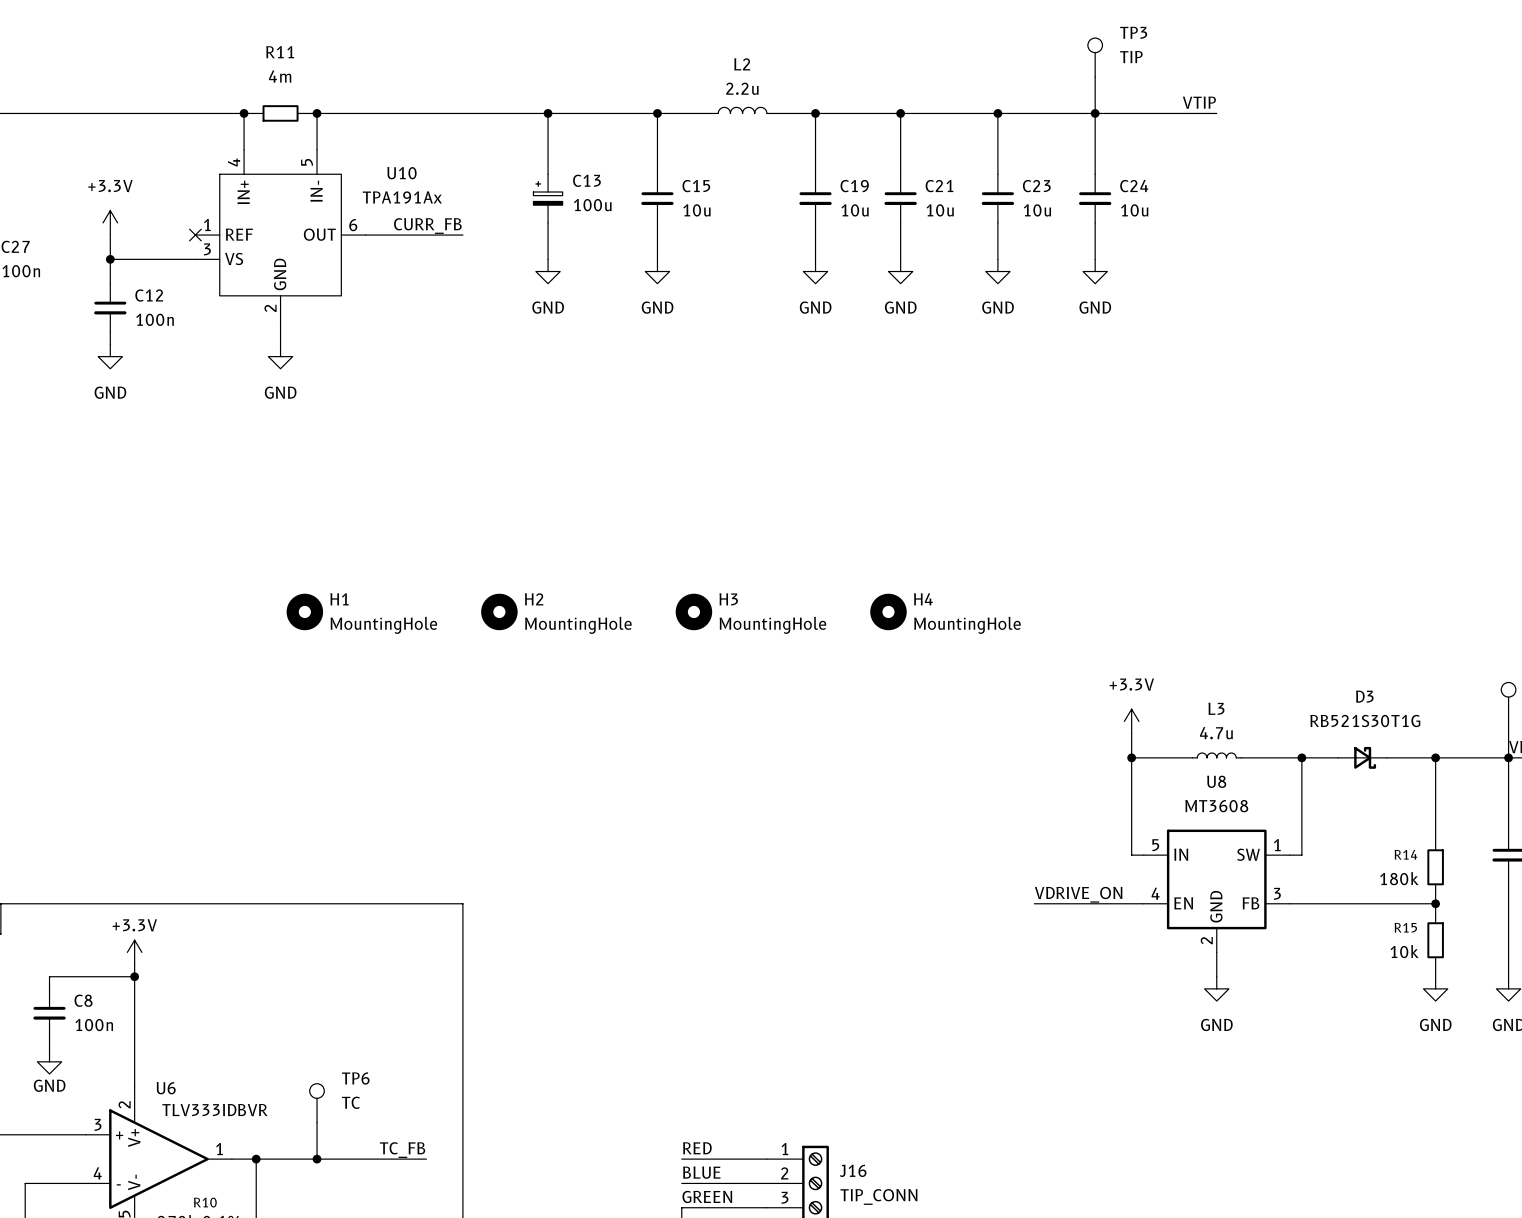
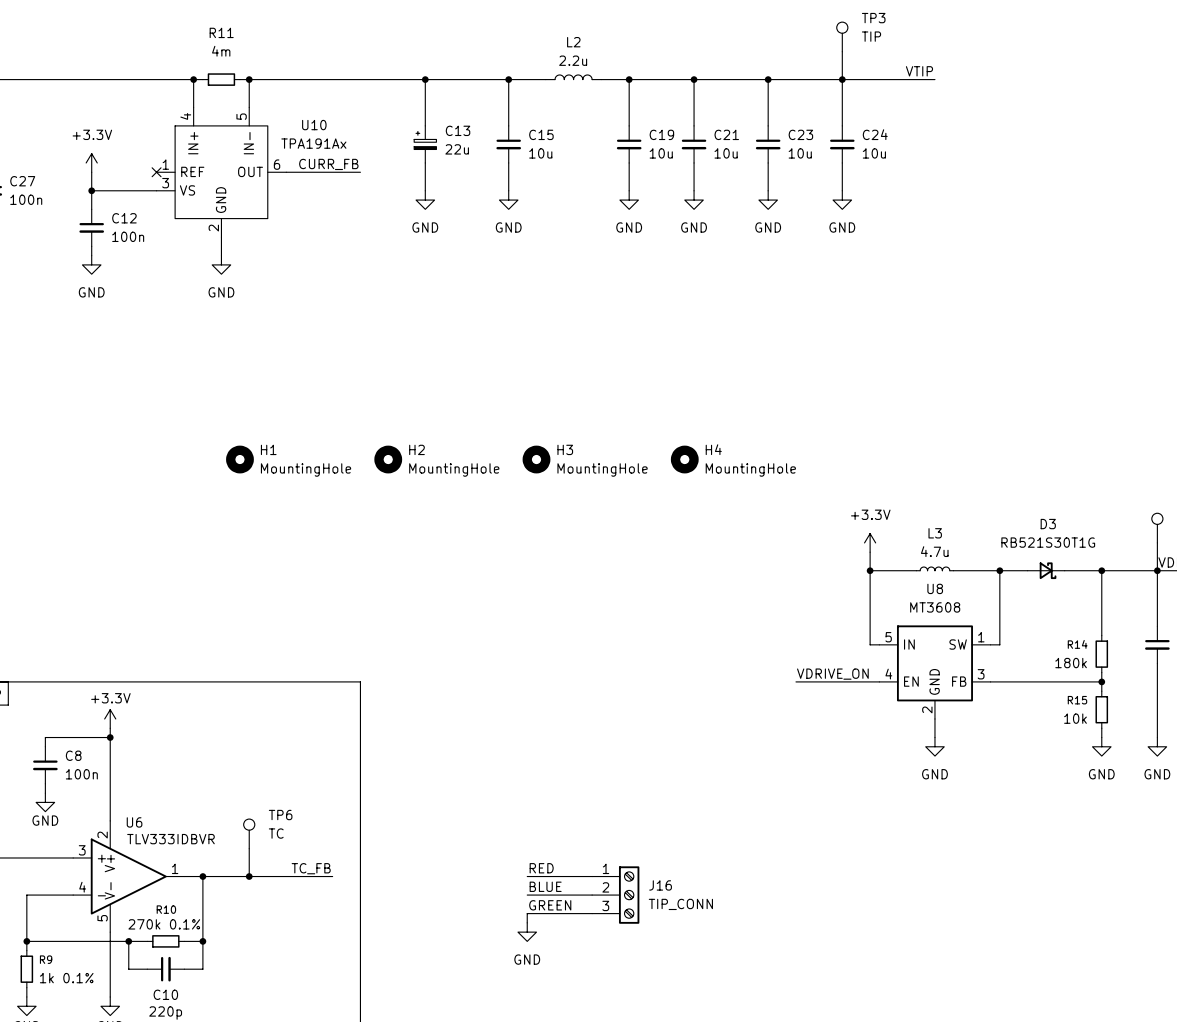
C13 value: 100u (592, 205) -> 22u (457, 149)

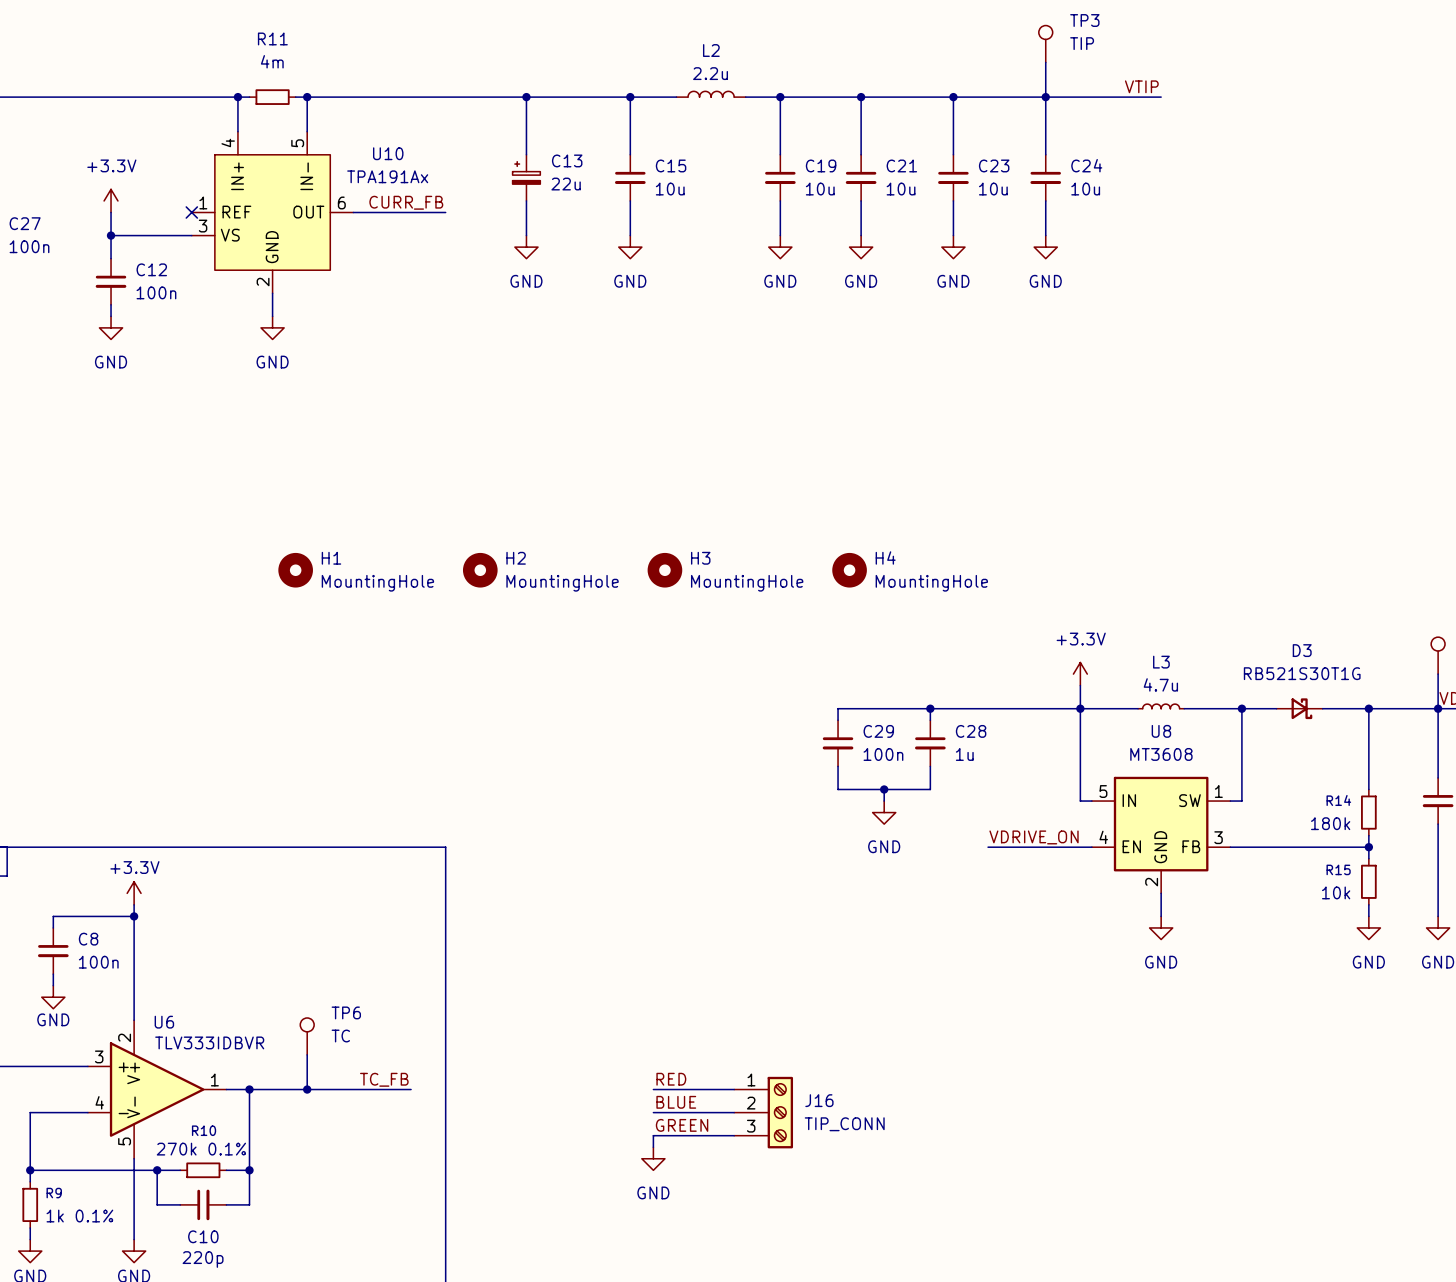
wire: none -> (930, 708) (930, 720)
junction: none -> (930, 708)
wire: none -> (1080, 708) (838, 708) (838, 720)
C29: none -> 100n (838, 743)
C28: none -> 1u (930, 743)
wire: none -> (838, 766) (838, 789) (930, 789) (930, 766)
wire: none -> (884, 789) (884, 801)
junction: none -> (884, 789)
power symbol: none -> GND (884, 812)

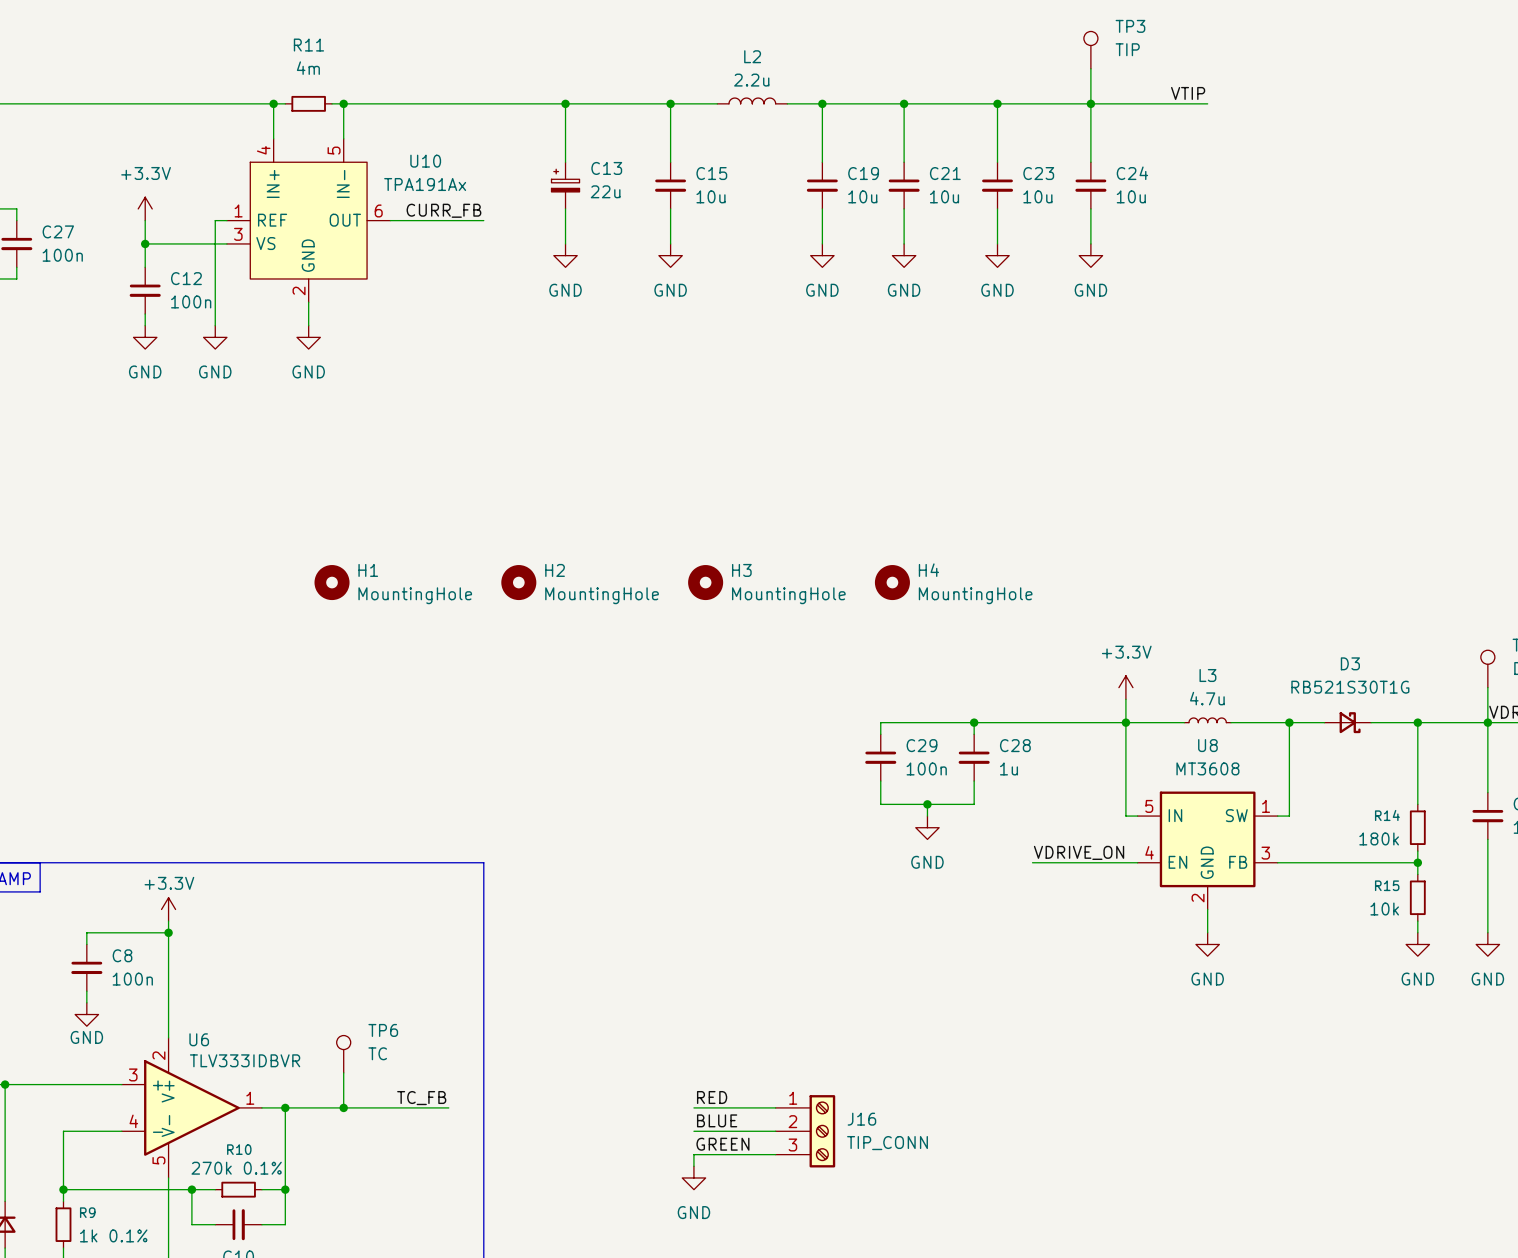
wire: none -> (226, 220) (215, 220) (215, 325)
no-connect mark: (191, 212) -> none
power symbol: none -> GND (215, 337)

